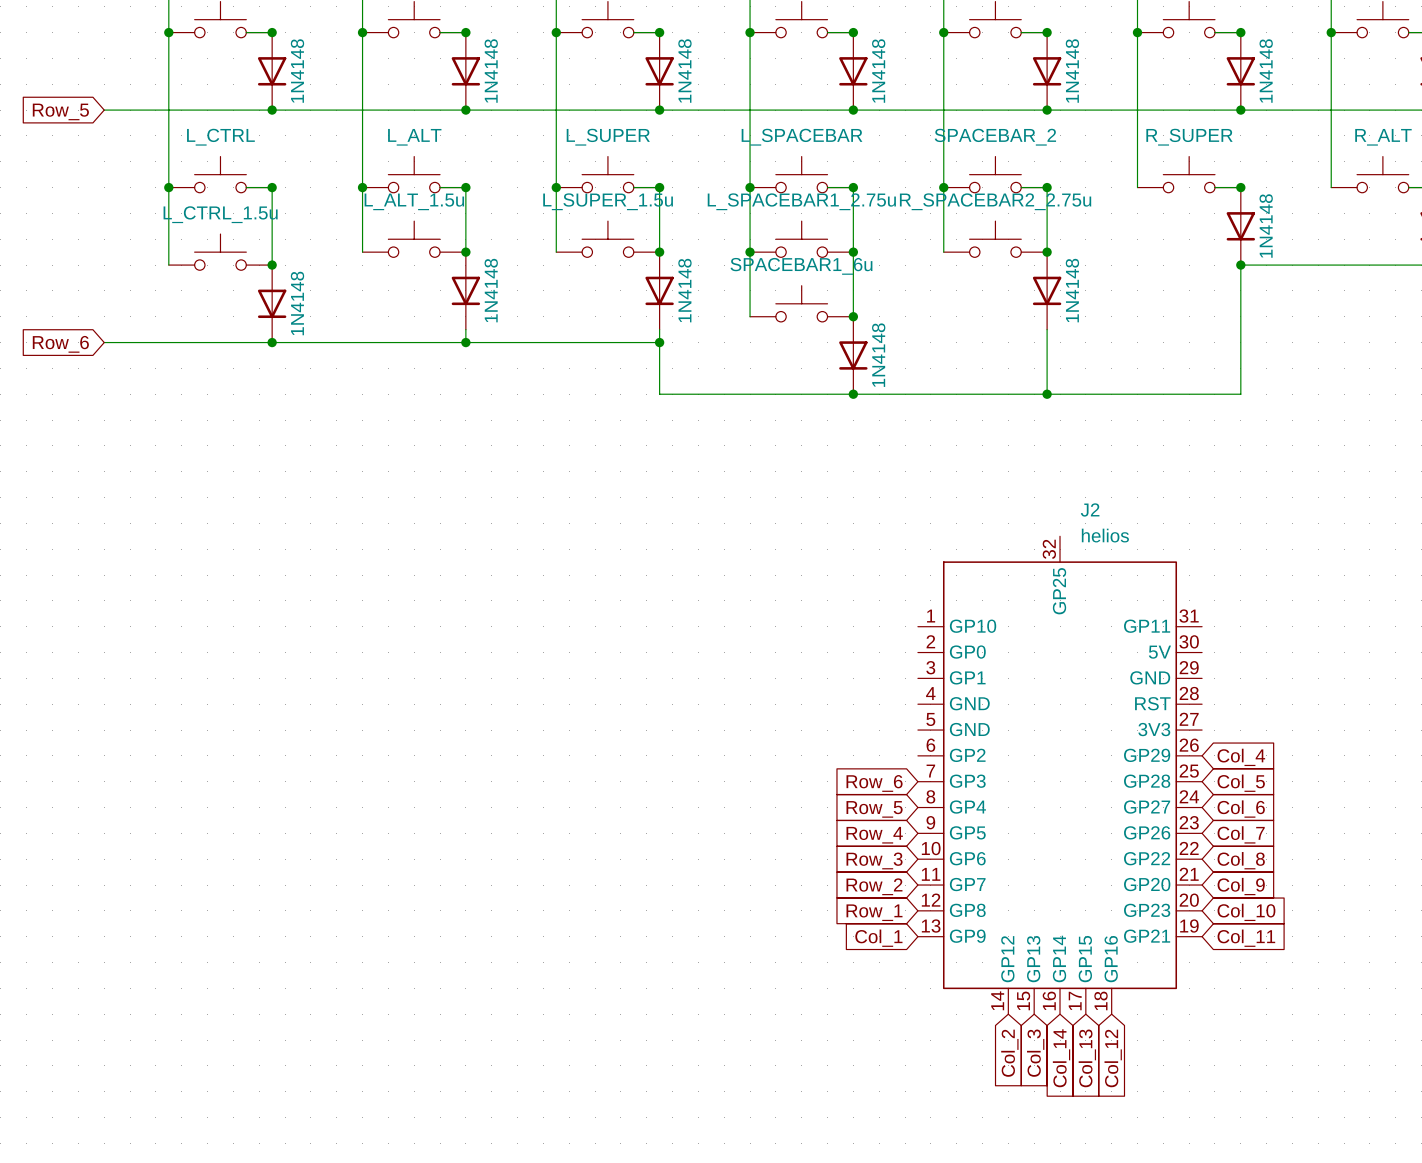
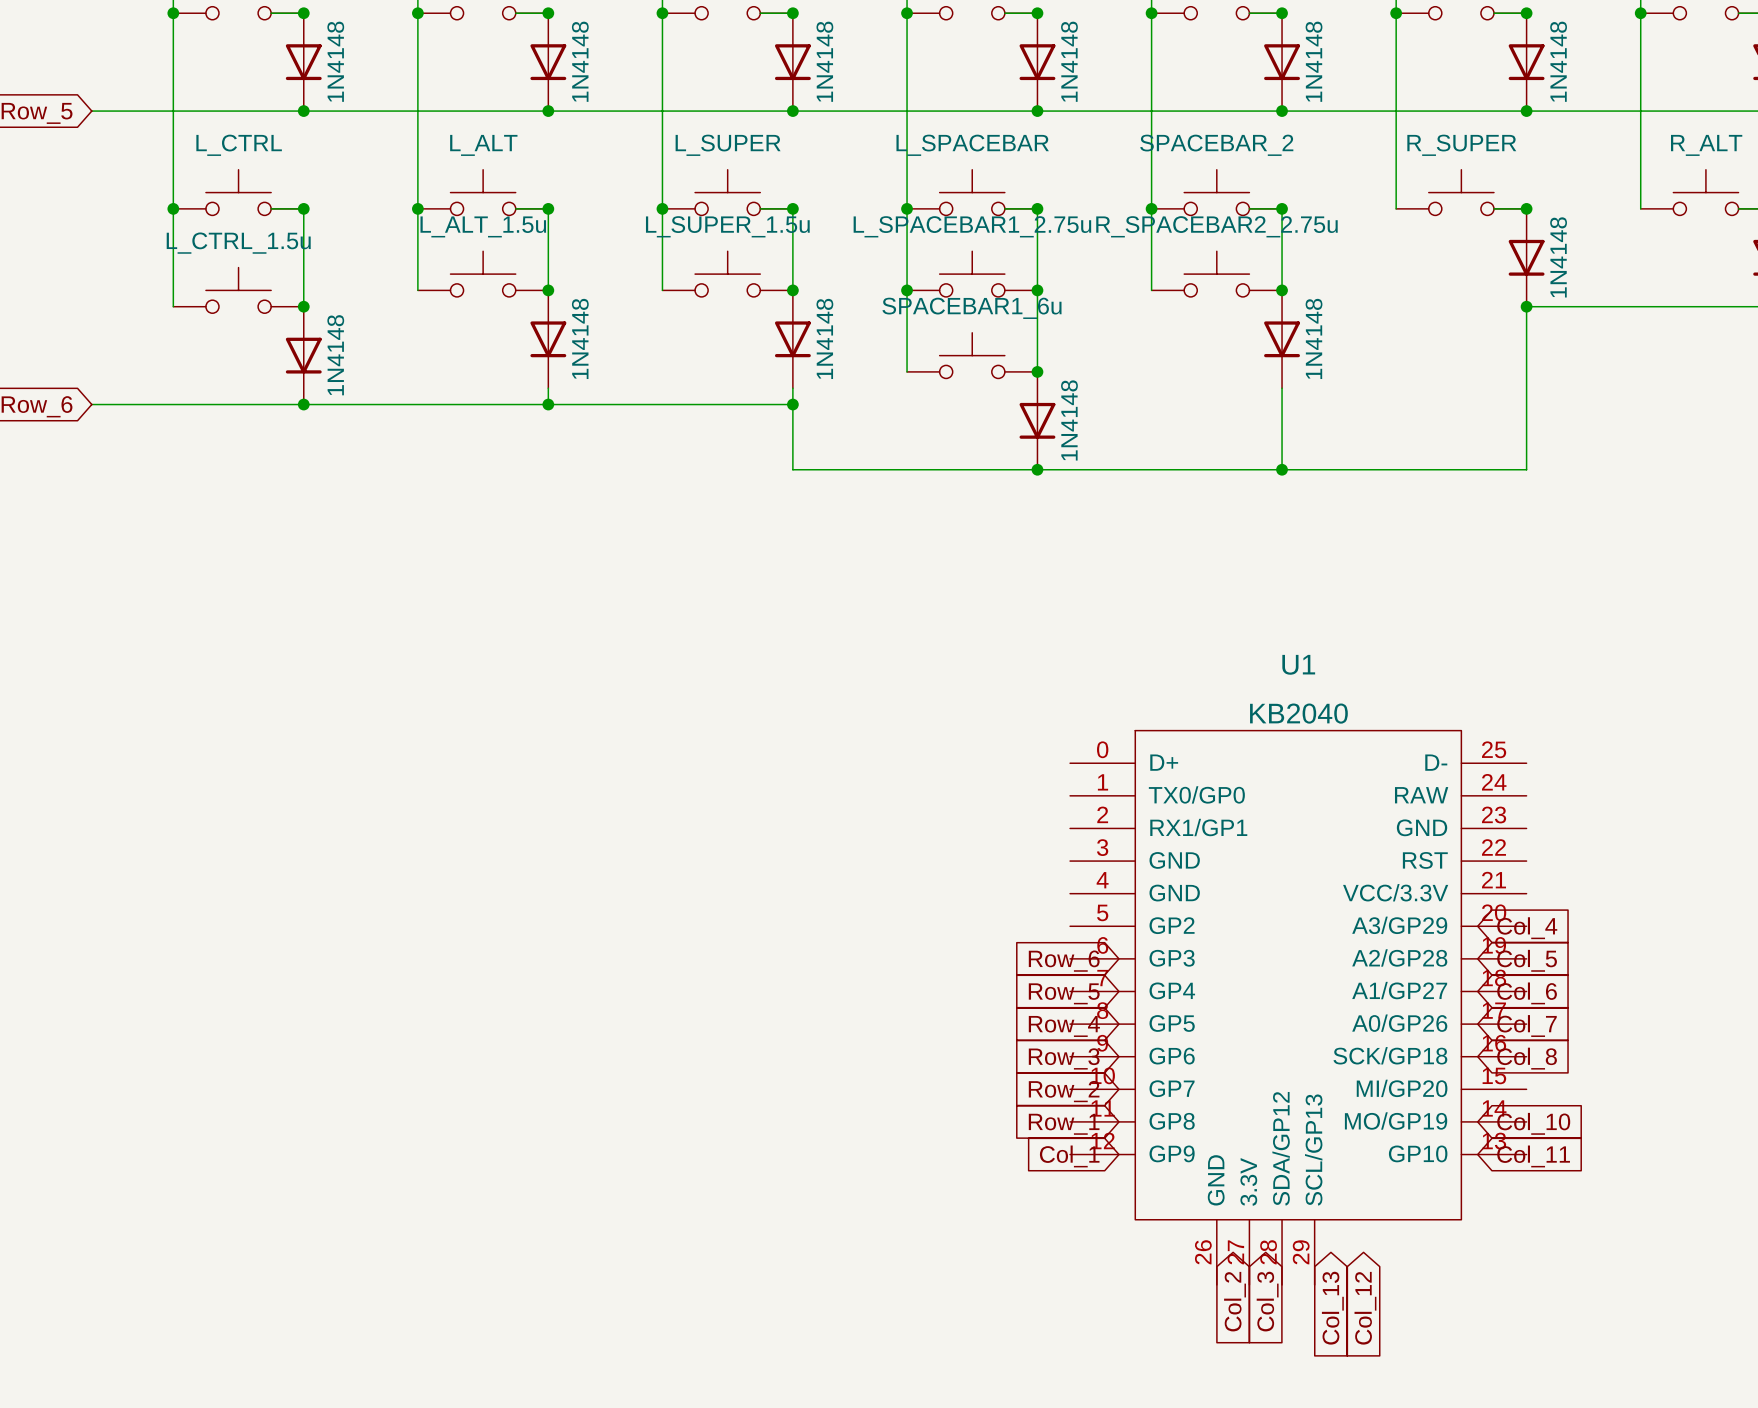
J2: helios (1060, 775) -> none
U1: none -> KB2040 (1298, 1007)
global label: Col_9 (1241, 886) -> none
global label: Col_14 (1061, 1058) -> none

